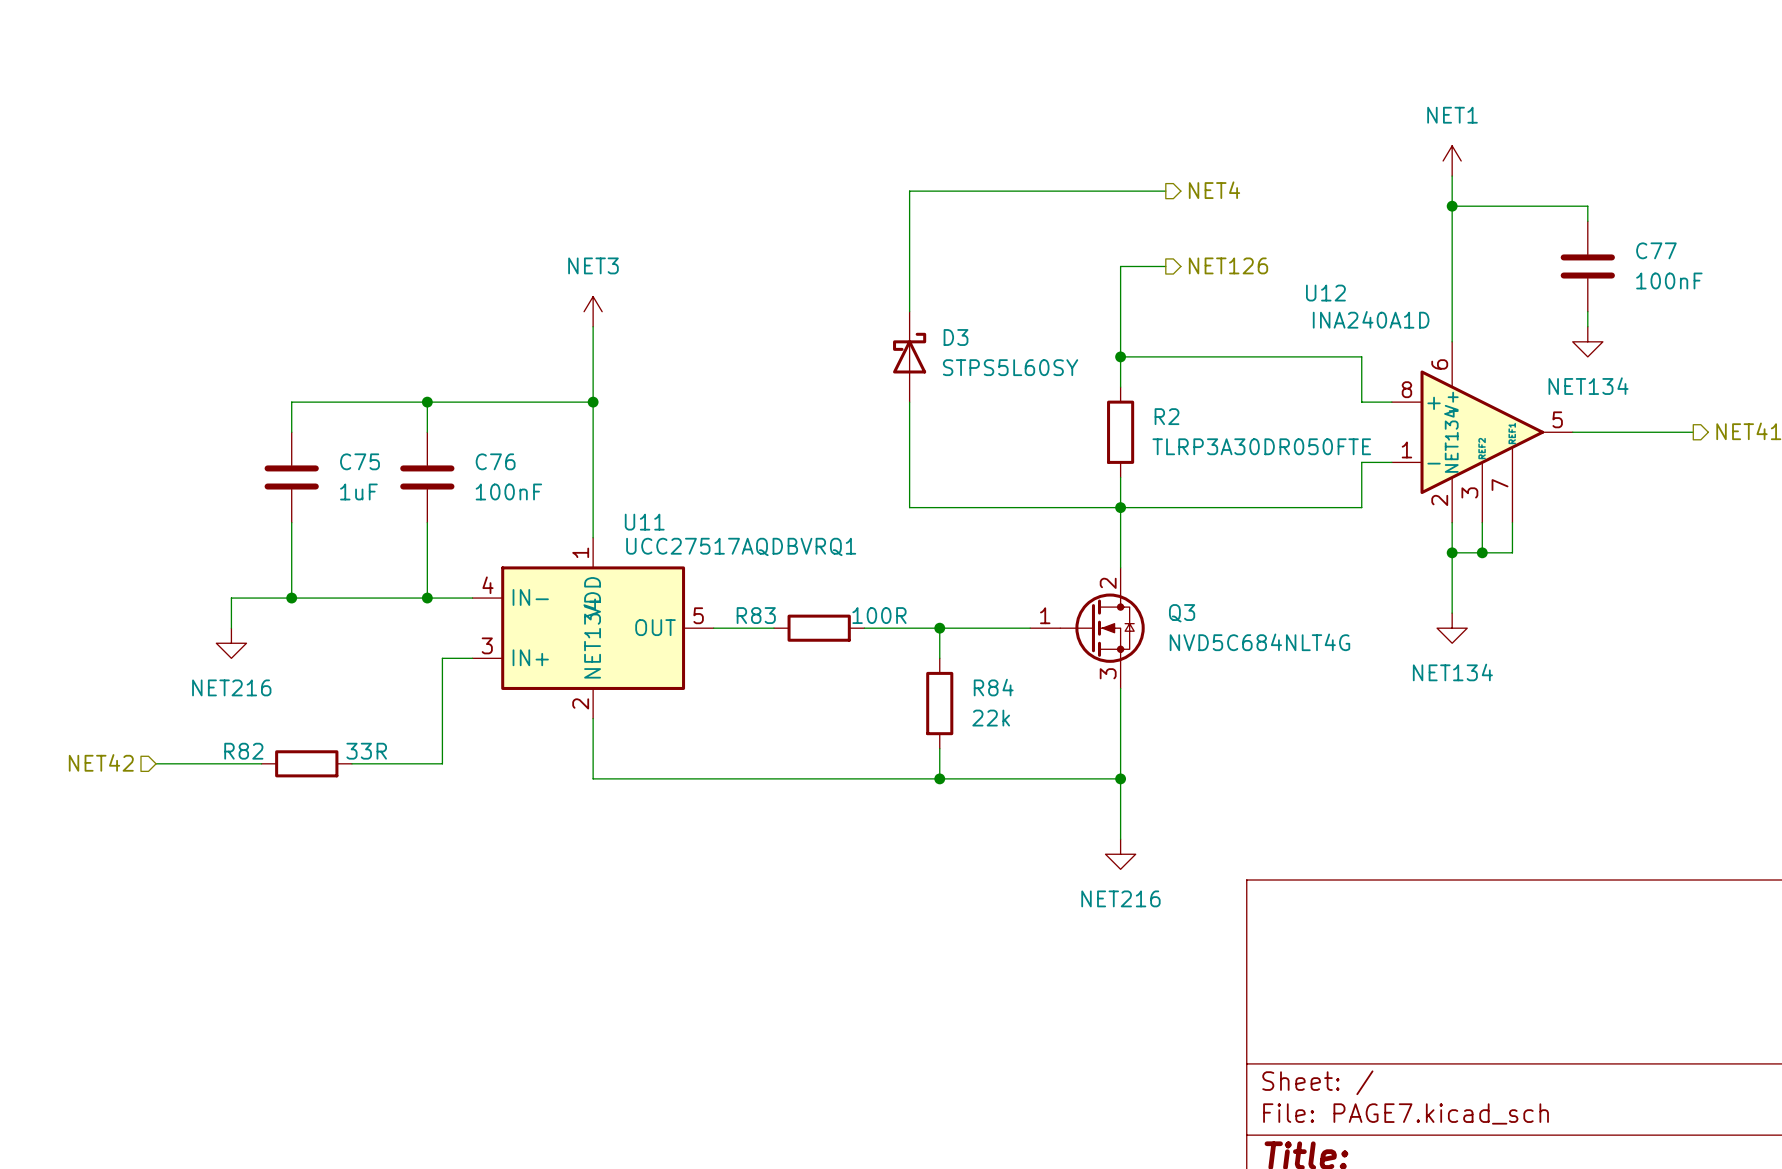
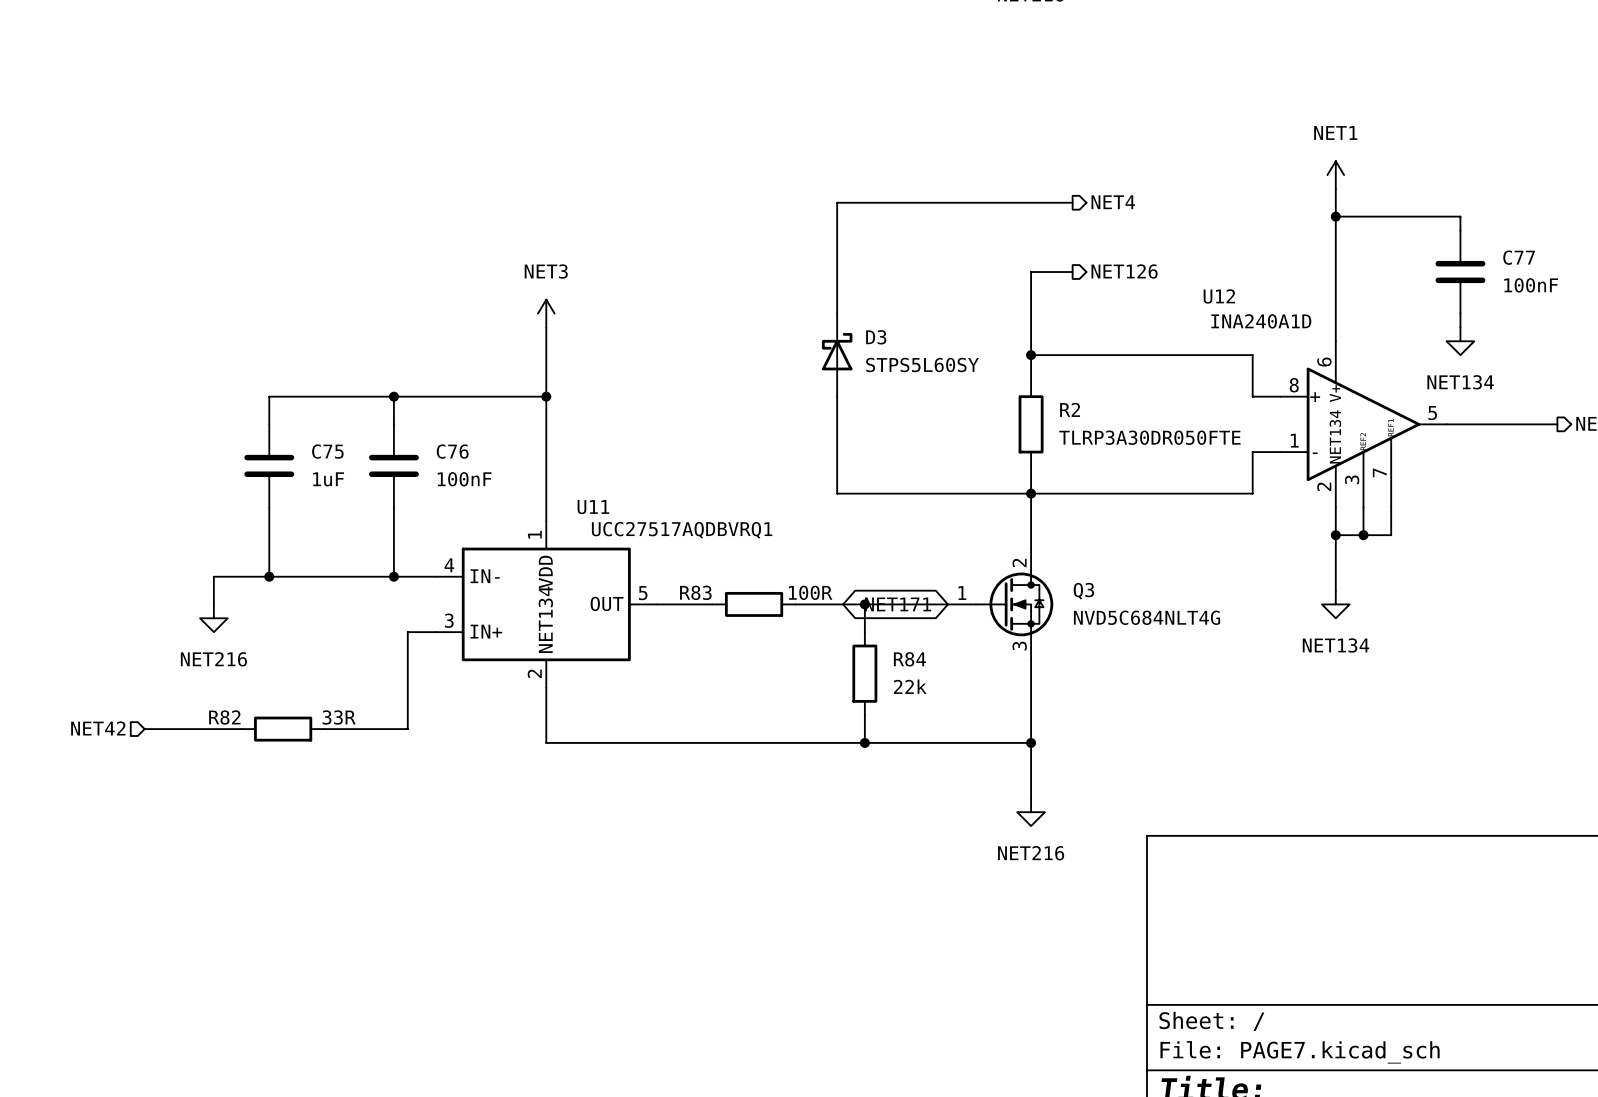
global label: none -> NET171 (898, 604)

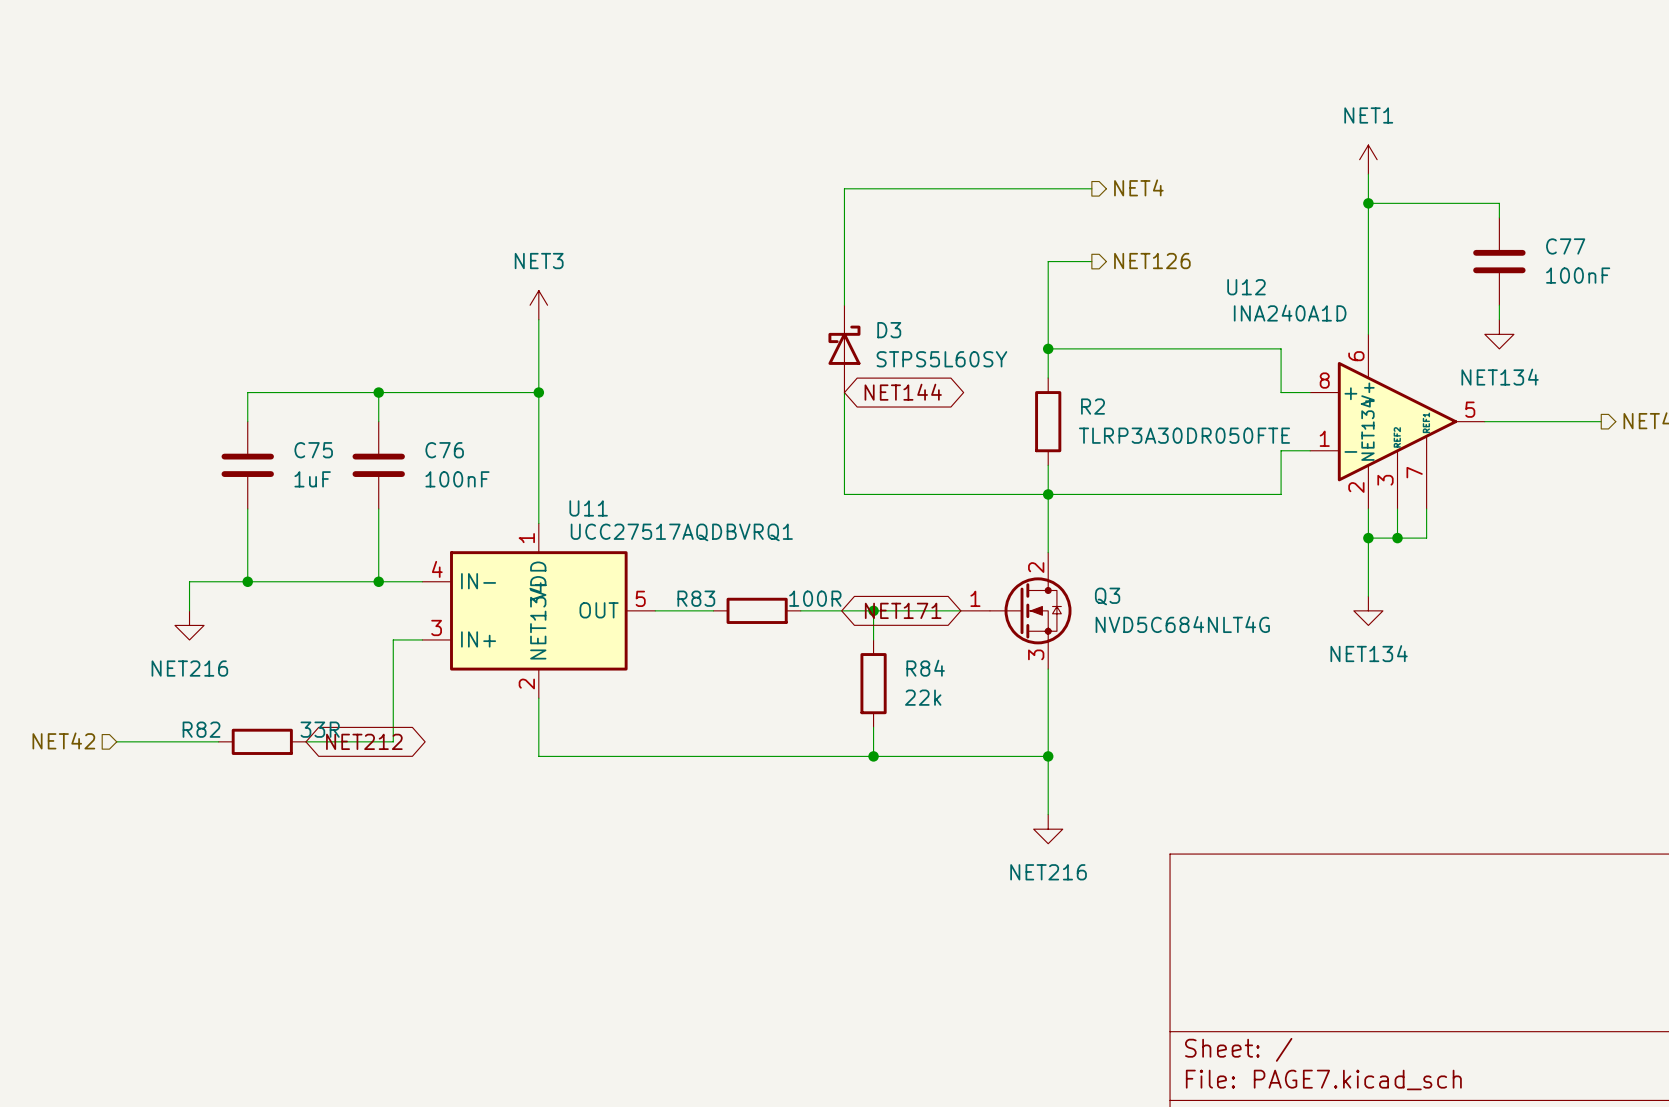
global label: none -> NET144 (903, 392)
global label: none -> NET212 (364, 741)

